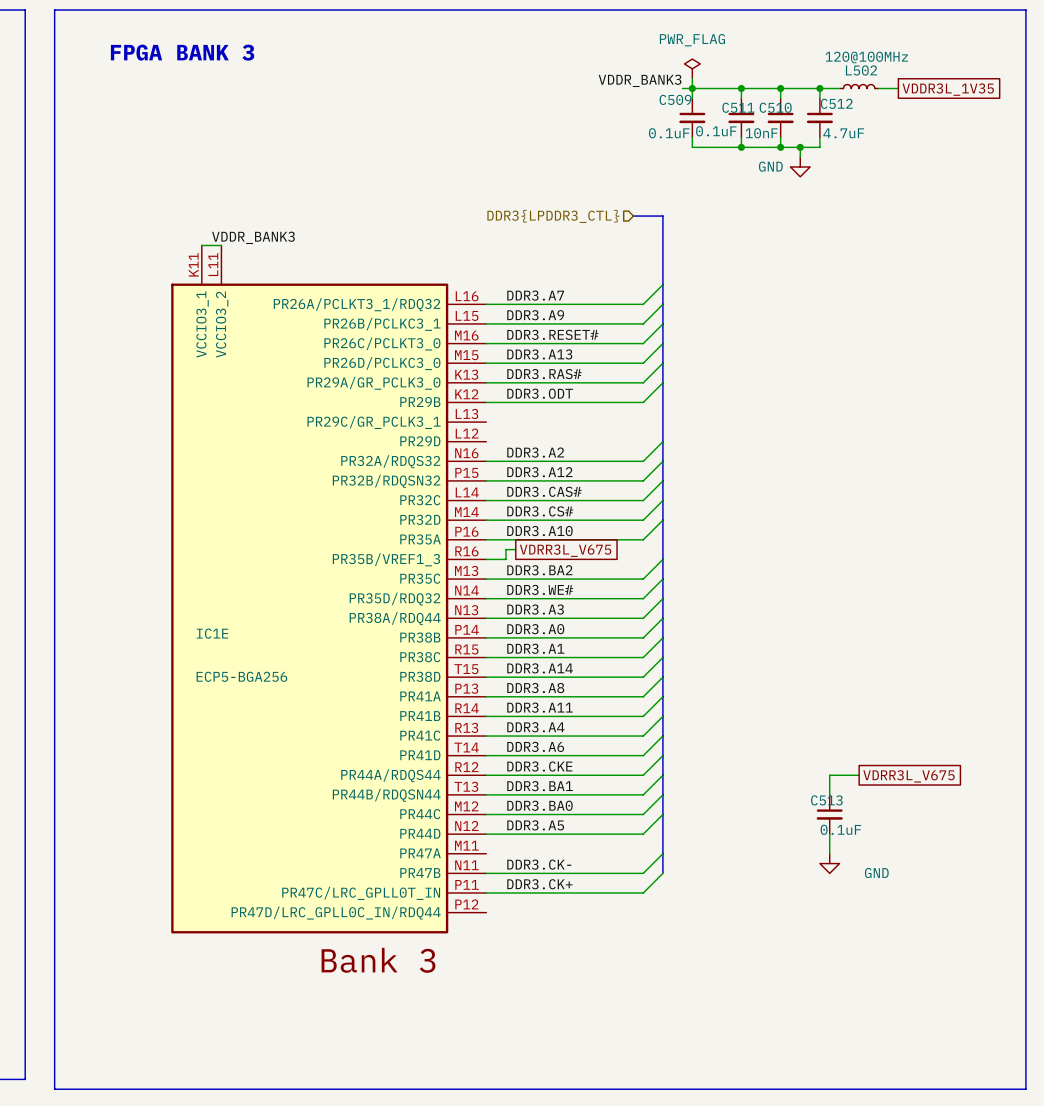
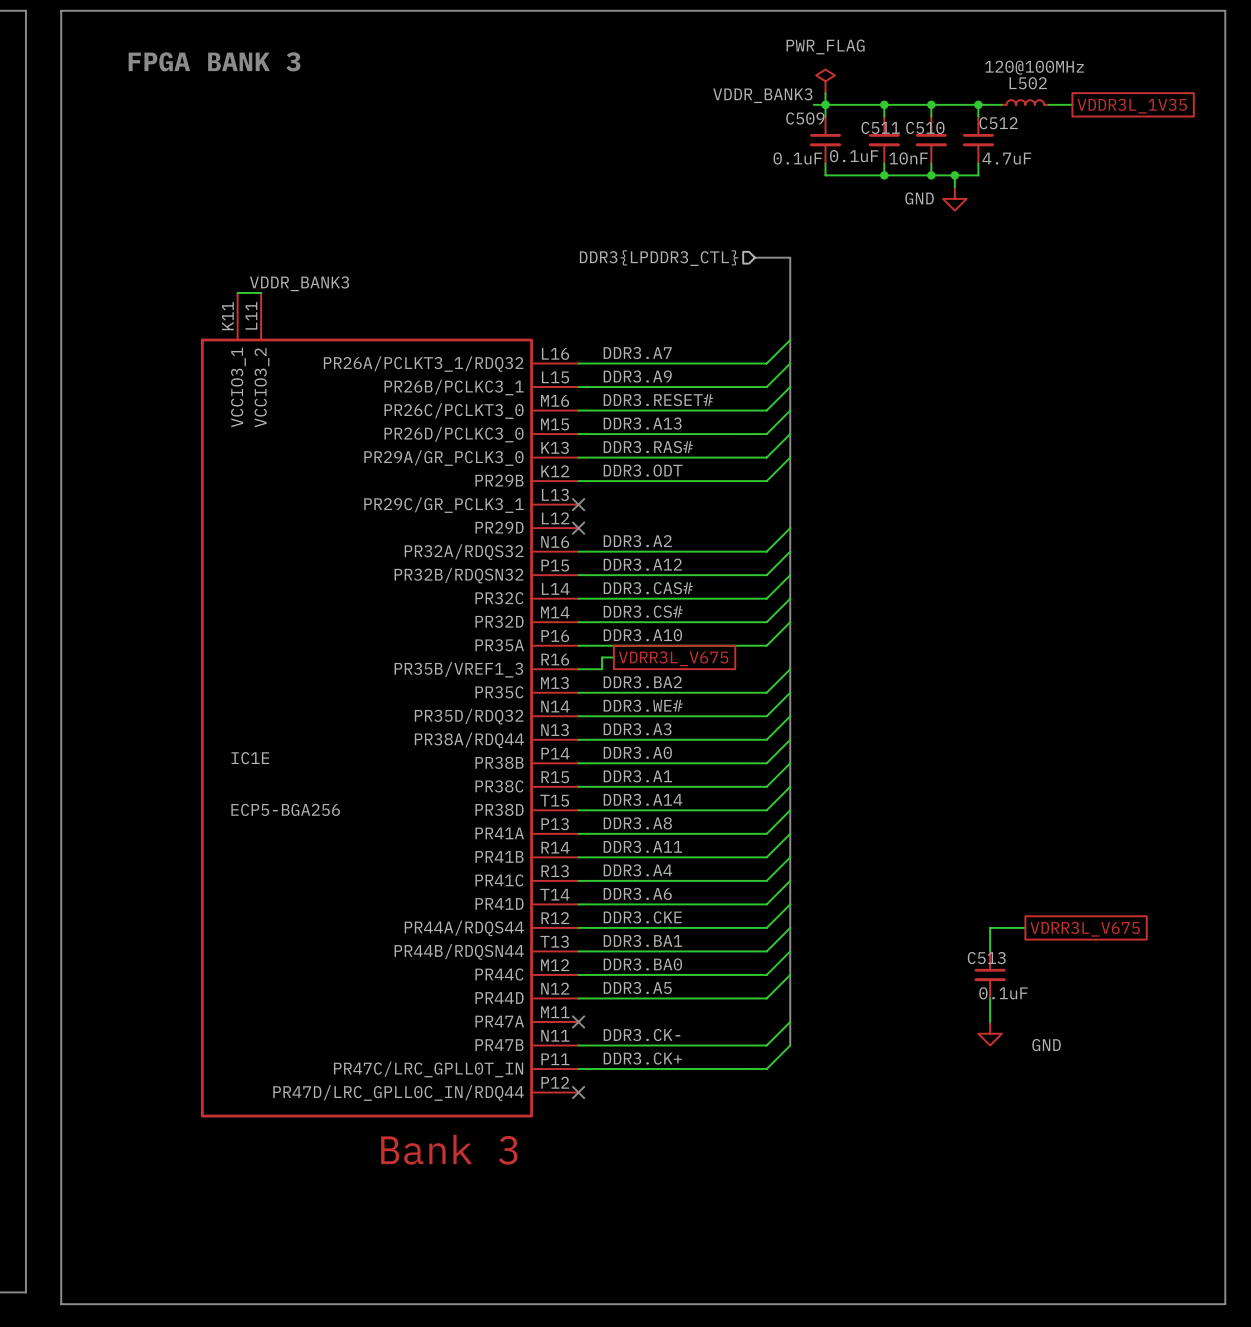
no-connect mark: none -> (578, 504)
no-connect mark: none -> (578, 528)
no-connect mark: none -> (578, 1021)
no-connect mark: none -> (578, 1092)

